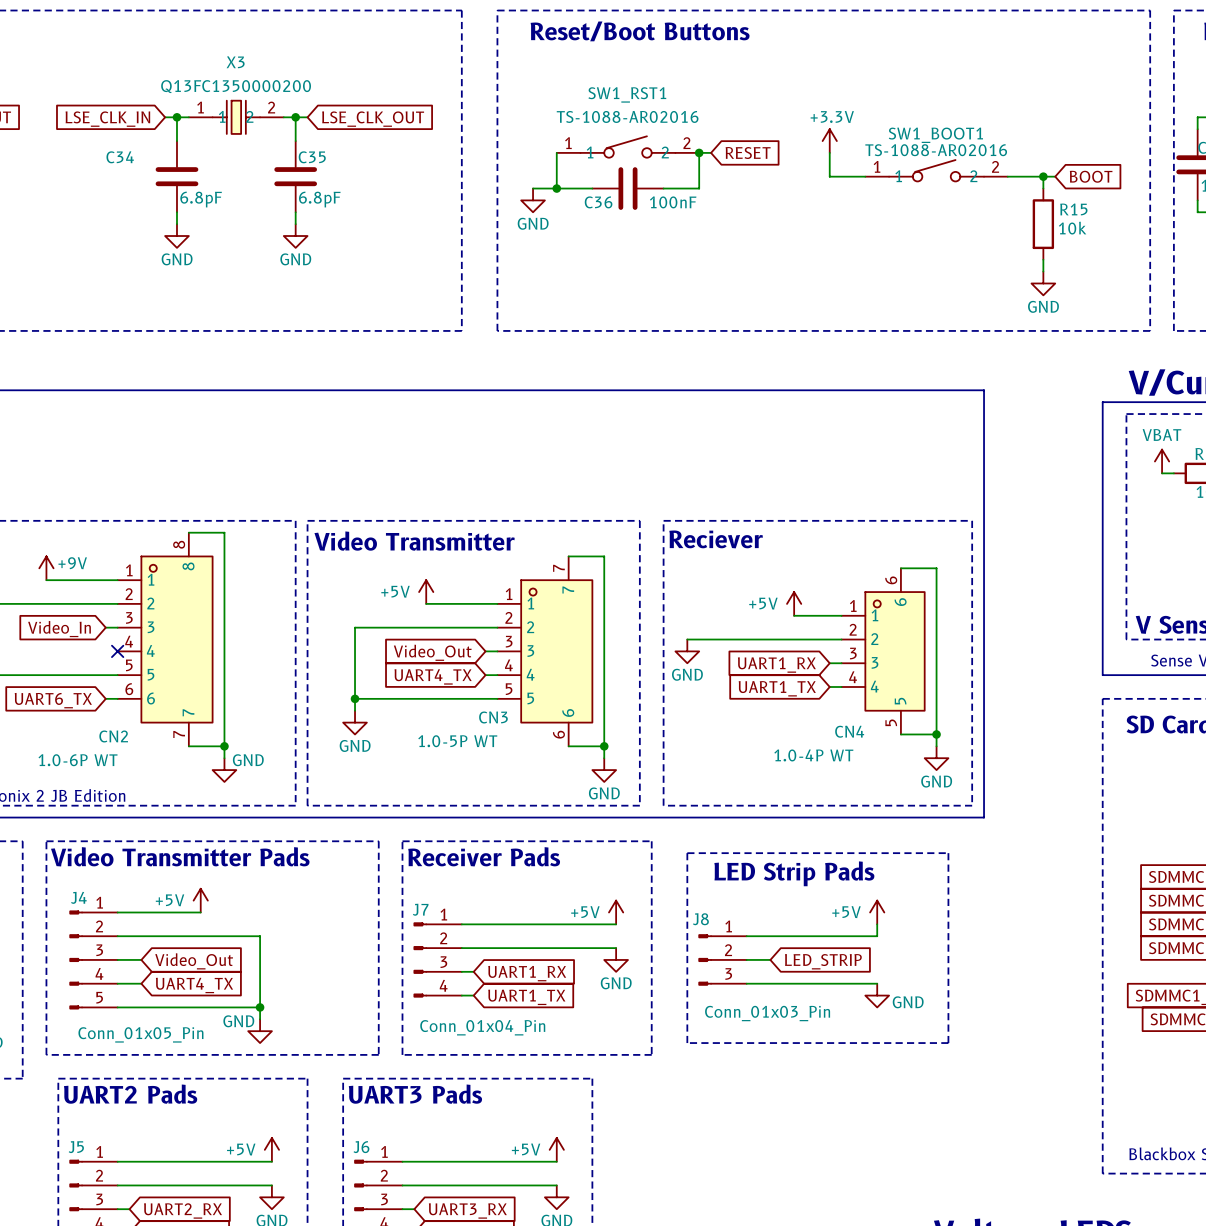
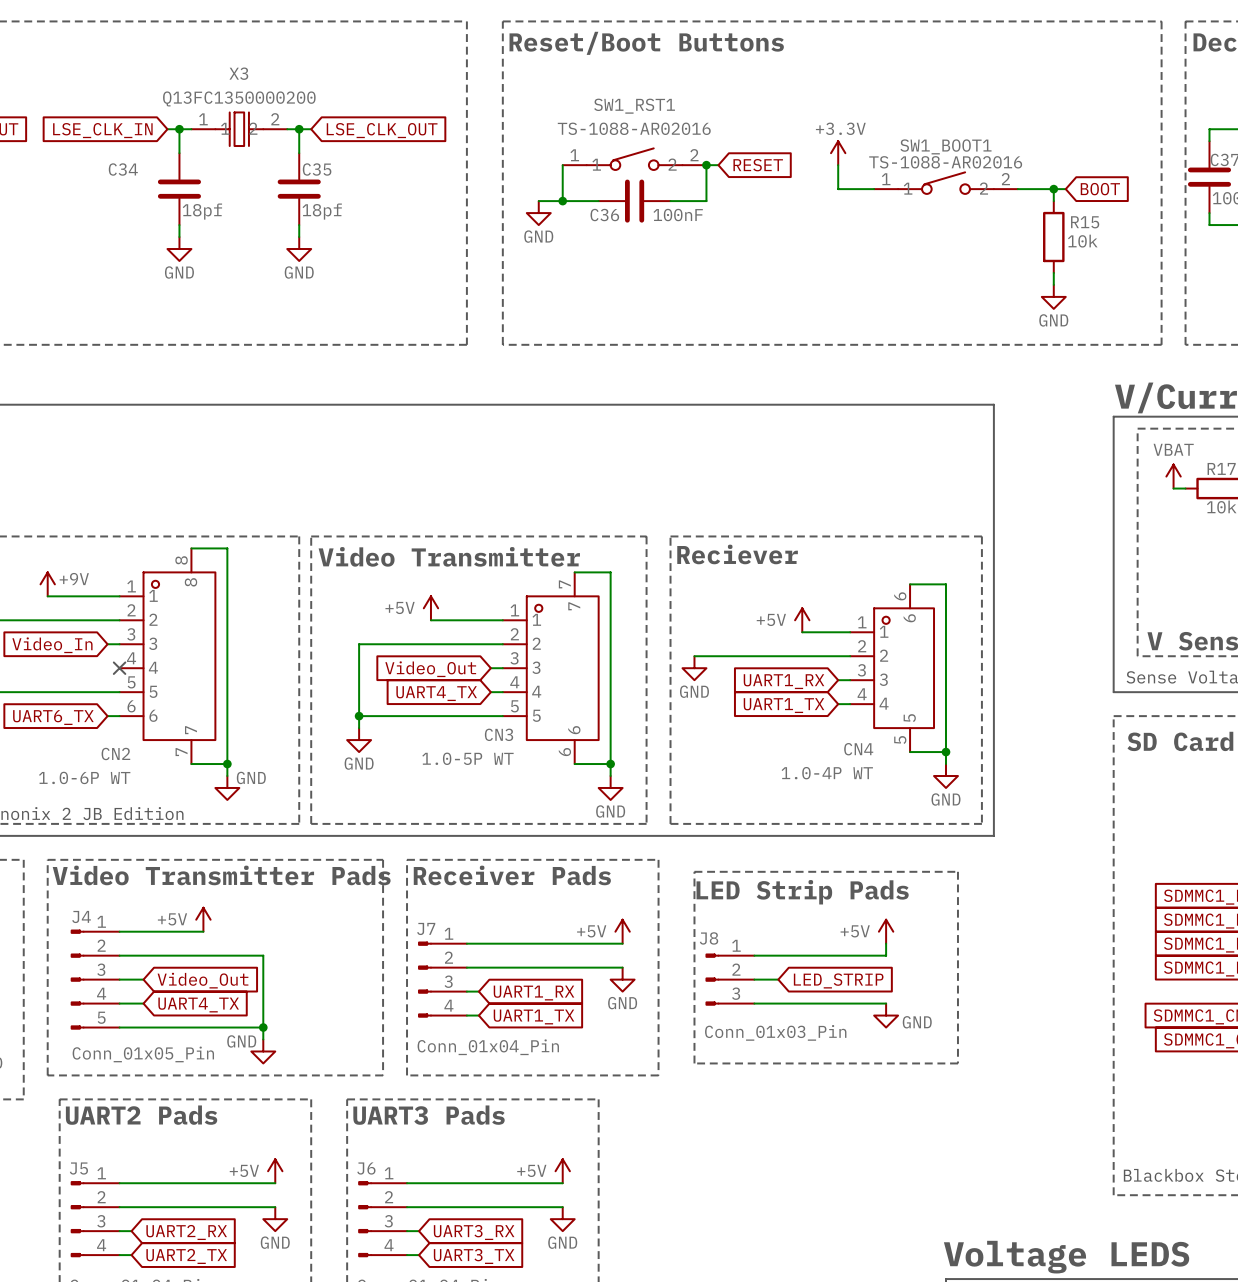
C34 value: 6.8pF (201, 199) -> 18pf (202, 211)
C35 value: 6.8pF (319, 199) -> 18pf (322, 211)

